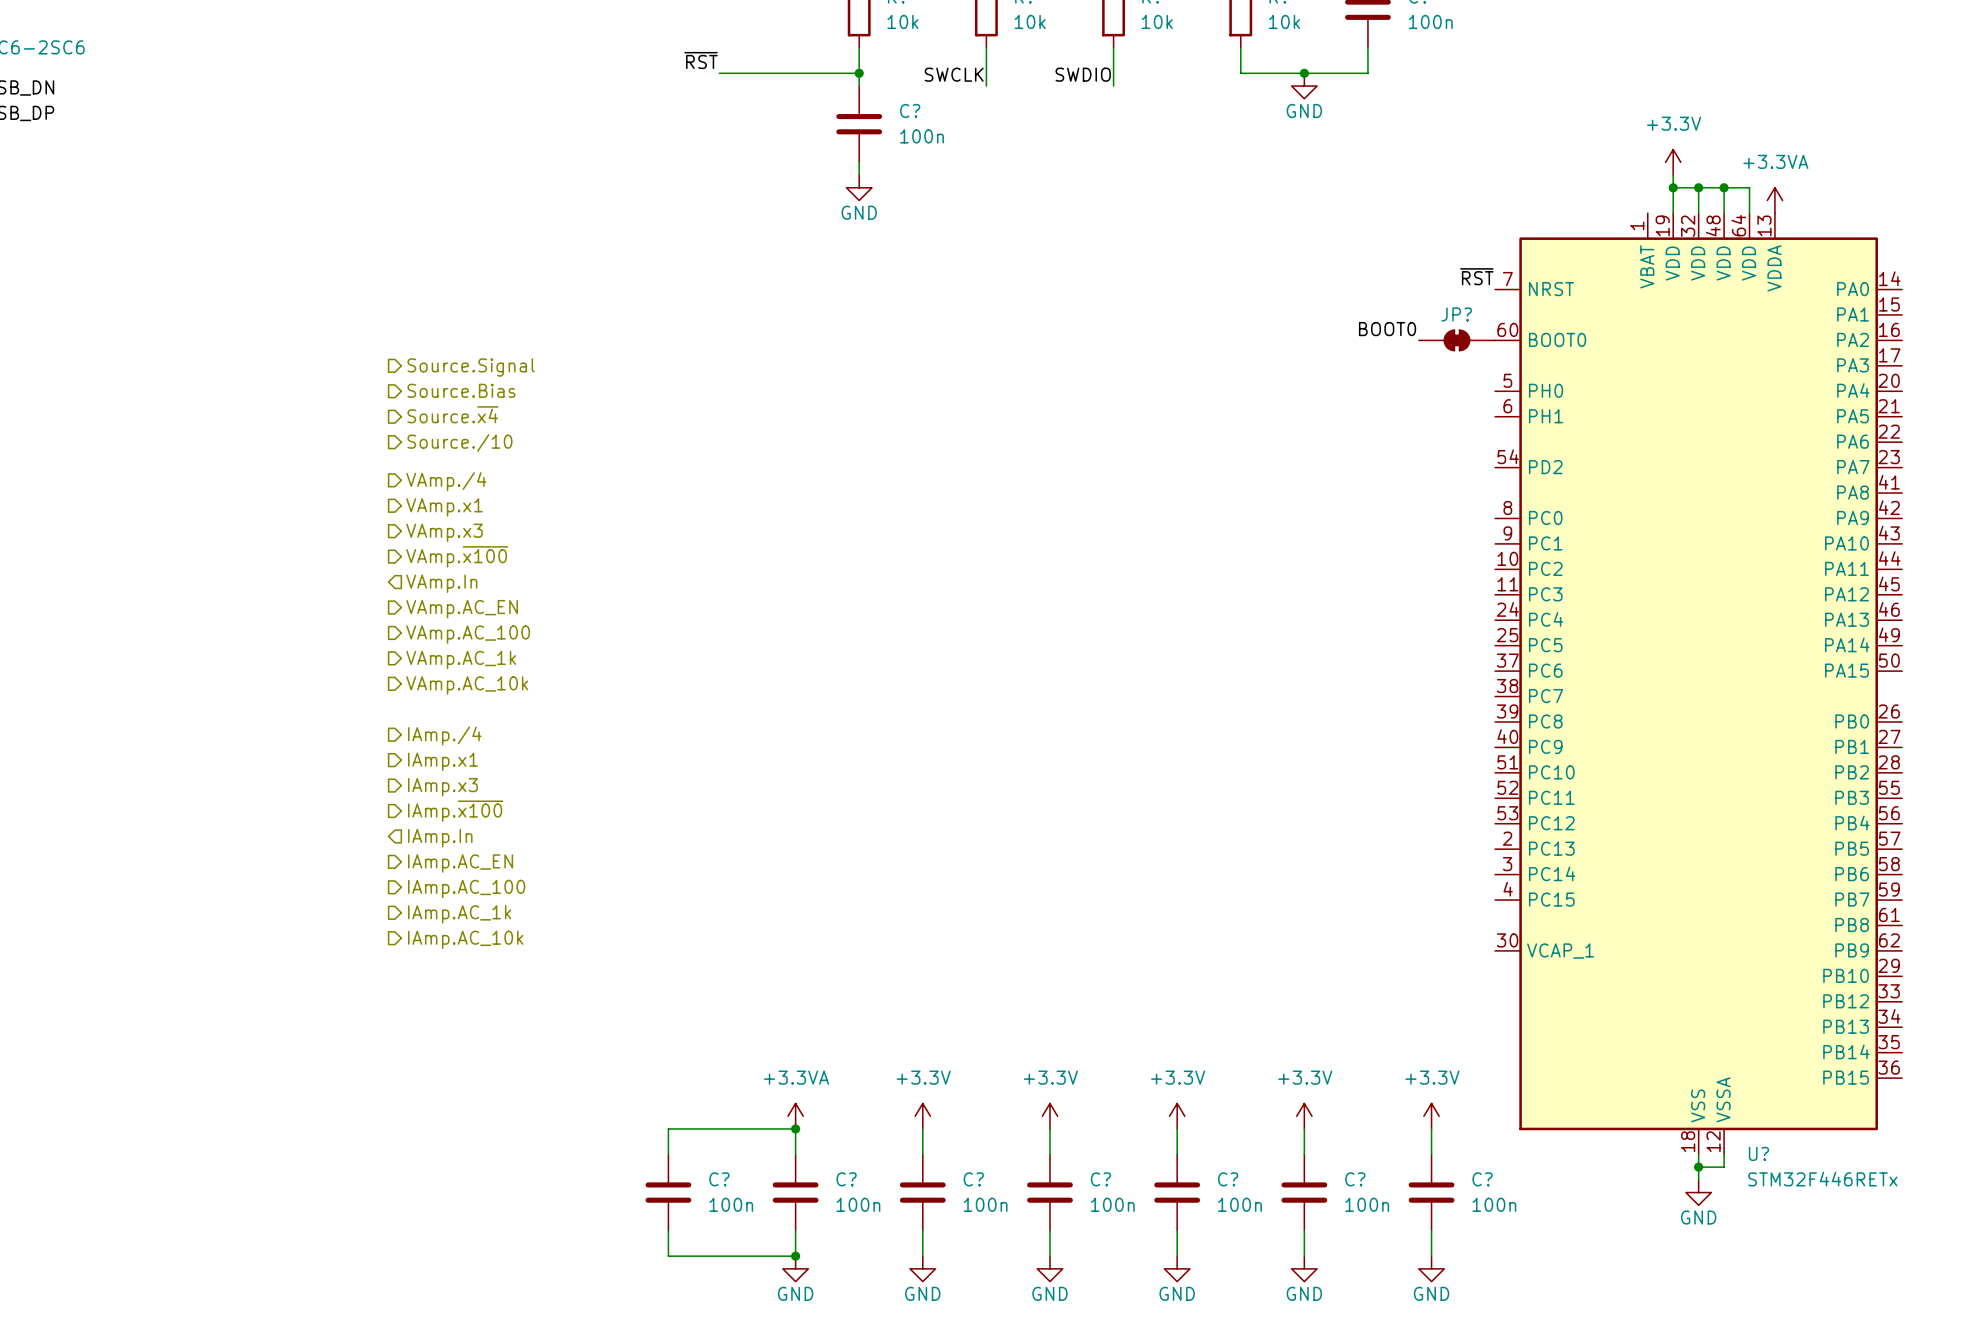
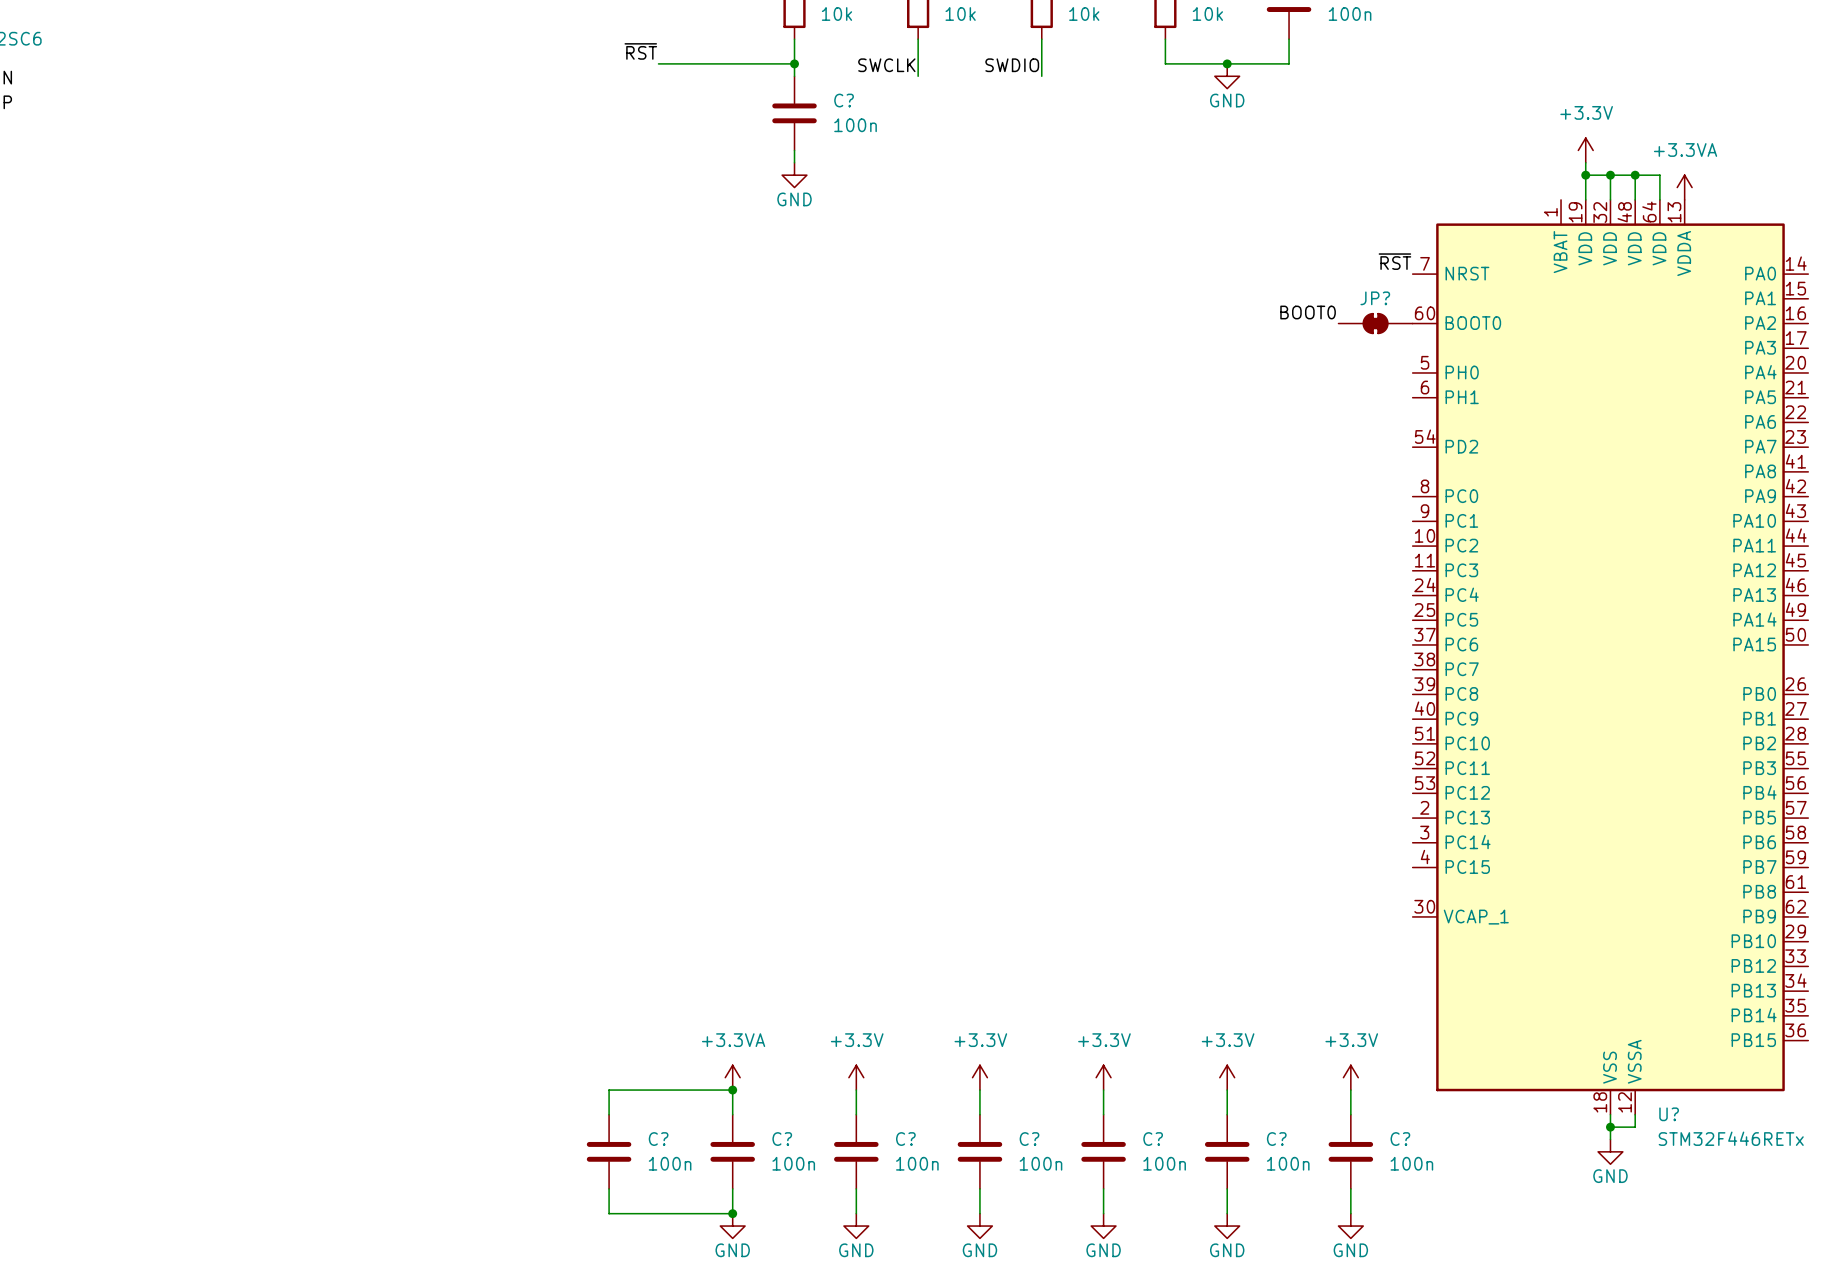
hierarchical label: Source.Signal (471, 367) -> none
hierarchical label: Source.Bias (461, 390) -> none
hierarchical label: Source.~{x4} (452, 414) -> none
hierarchical label: Source./10 (459, 442) -> none
hierarchical label: VAmp./4 (446, 481) -> none
hierarchical label: VAmp.x1 (444, 507) -> none
hierarchical label: VAmp.x3 (444, 532) -> none
hierarchical label: VAmp.~{x100} (457, 556) -> none
hierarchical label: VAmp.In (441, 583) -> none
hierarchical label: VAmp.AC_EN (462, 609) -> none
hierarchical label: VAmp.AC_100 (468, 634) -> none
hierarchical label: VAmp.AC_1k (461, 660) -> none
hierarchical label: VAmp.AC_10k (467, 685) -> none
hierarchical label: IAmp./4 (444, 736) -> none
hierarchical label: IAmp.x1 (443, 761) -> none
hierarchical label: IAmp.x3 (443, 787) -> none
hierarchical label: IAmp.~{x100} (455, 811) -> none
hierarchical label: IAmp.In (440, 838) -> none
hierarchical label: IAmp.AC_EN (460, 863) -> none
hierarchical label: IAmp.AC_100 (466, 888) -> none
hierarchical label: IAmp.AC_1k (459, 914) -> none
hierarchical label: IAmp.AC_10k (465, 939) -> none

